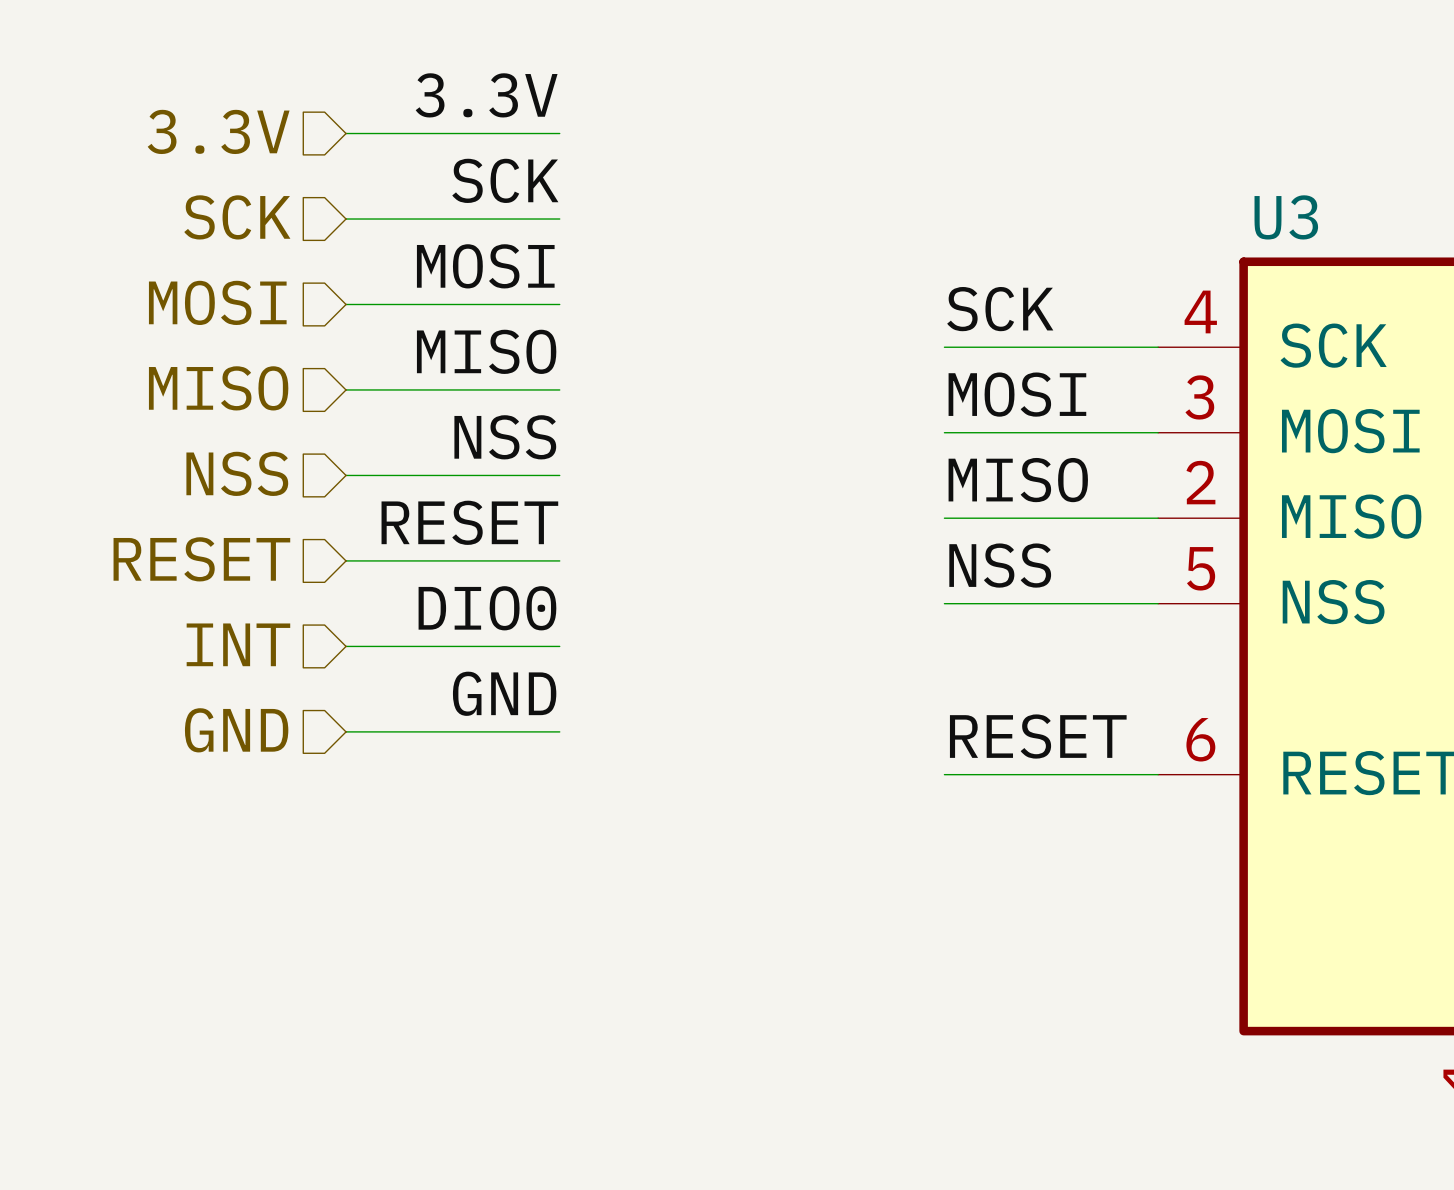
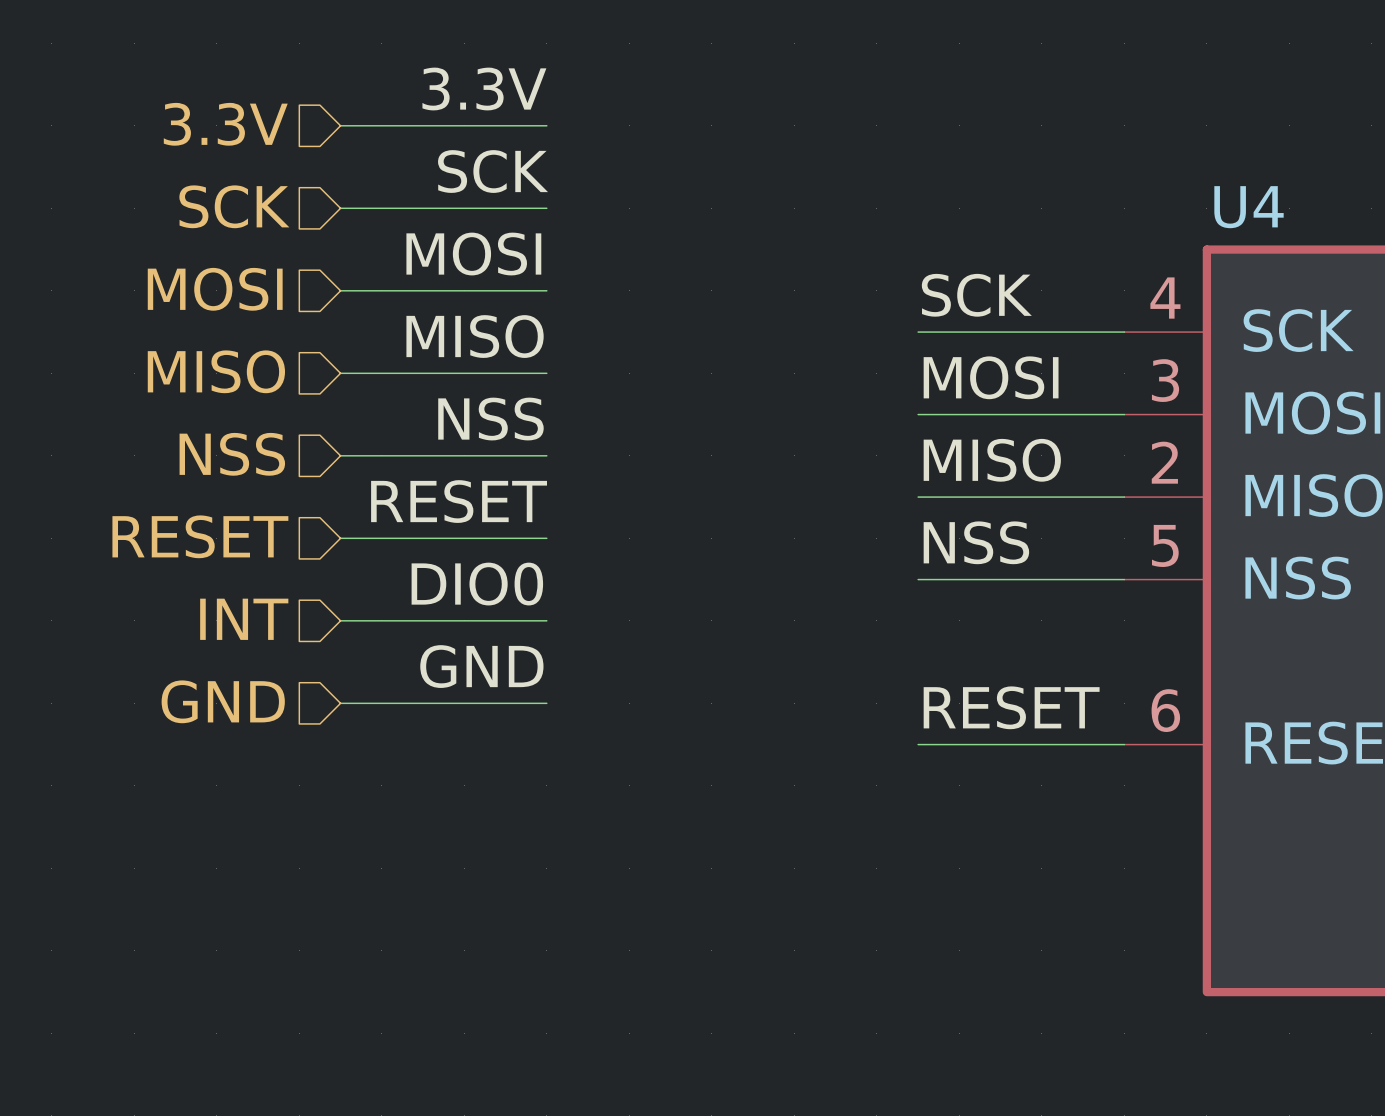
U3 name: U3 (1286, 217) -> U4 (1249, 207)

